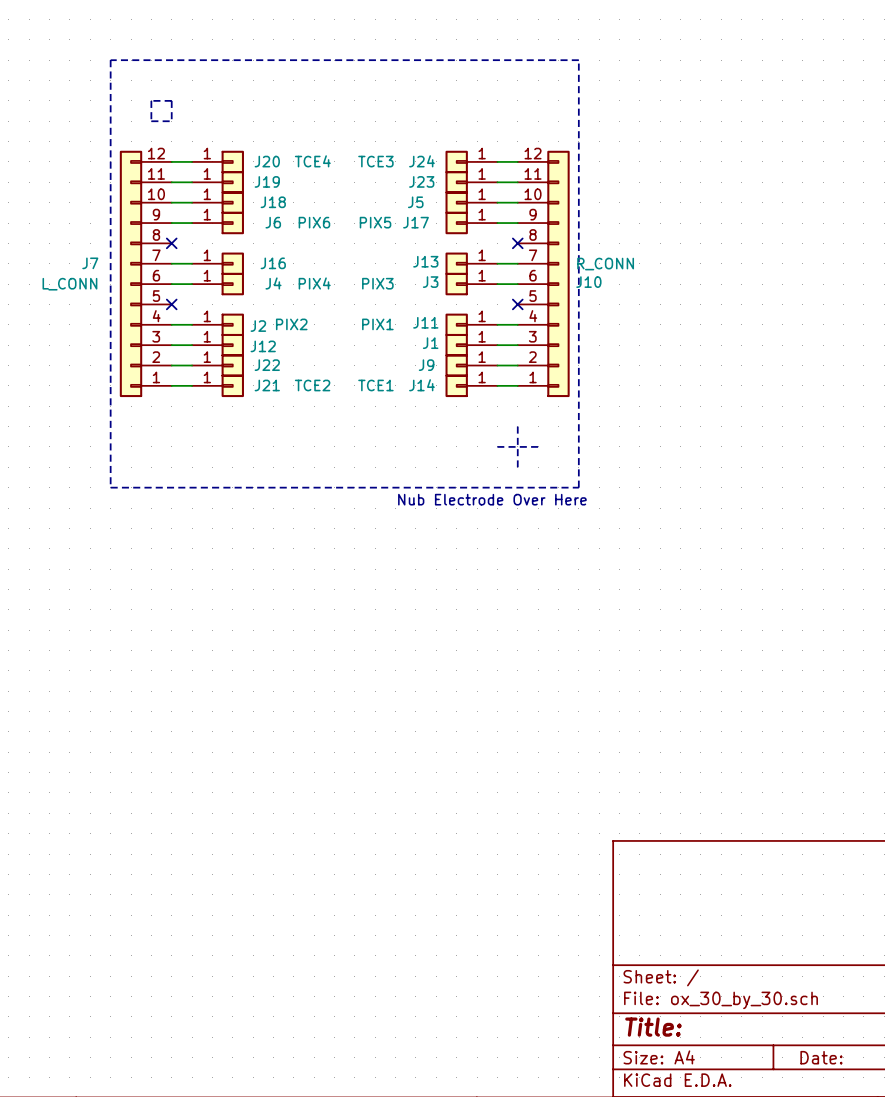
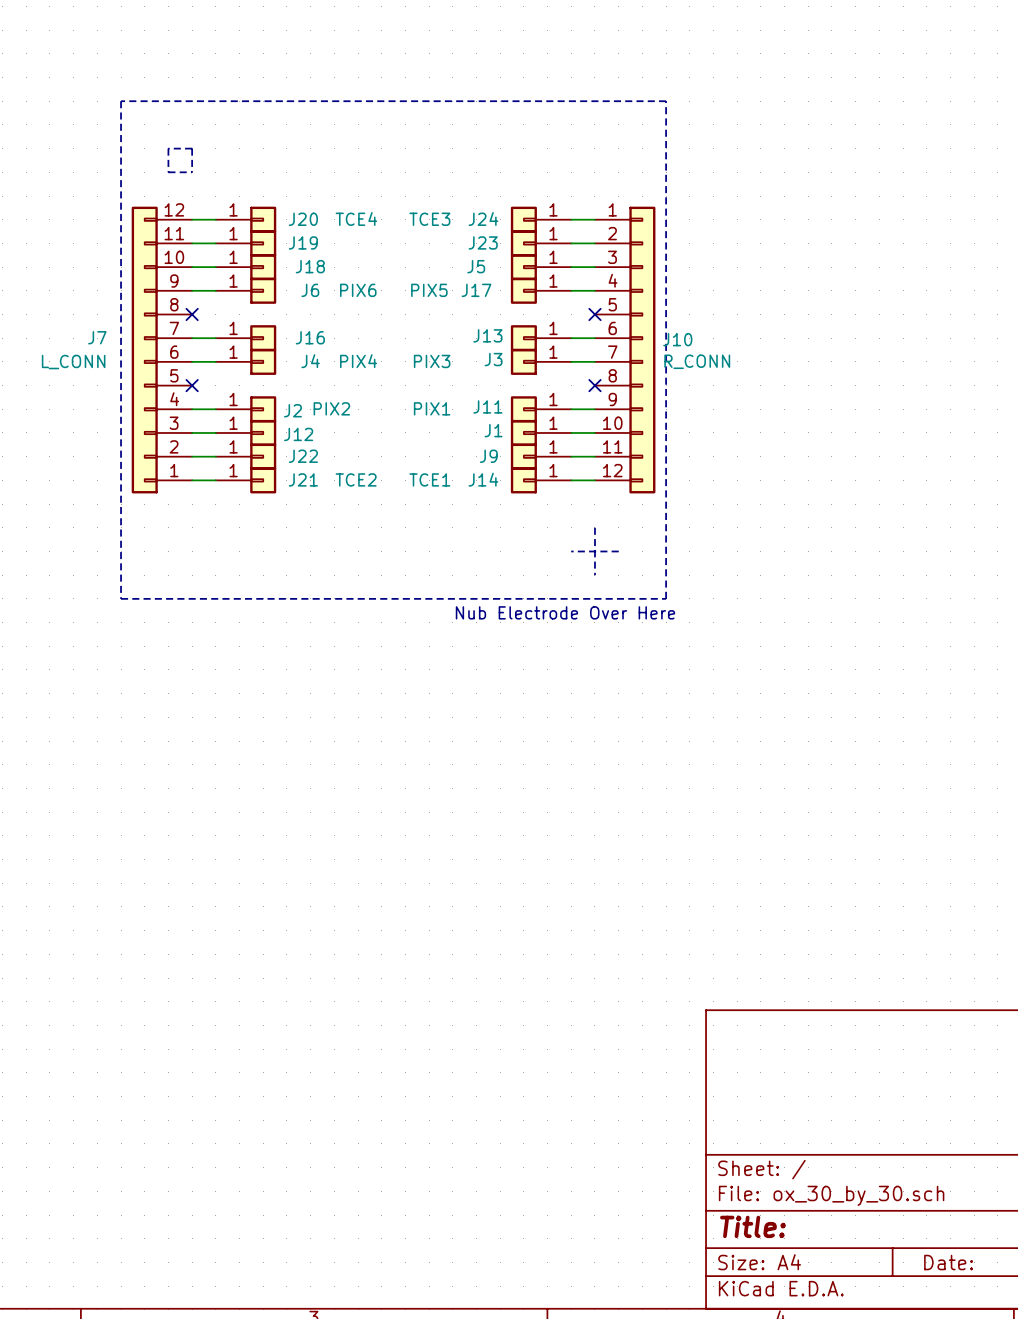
J10 flip: as is (558, 273) -> up-down (642, 350)

